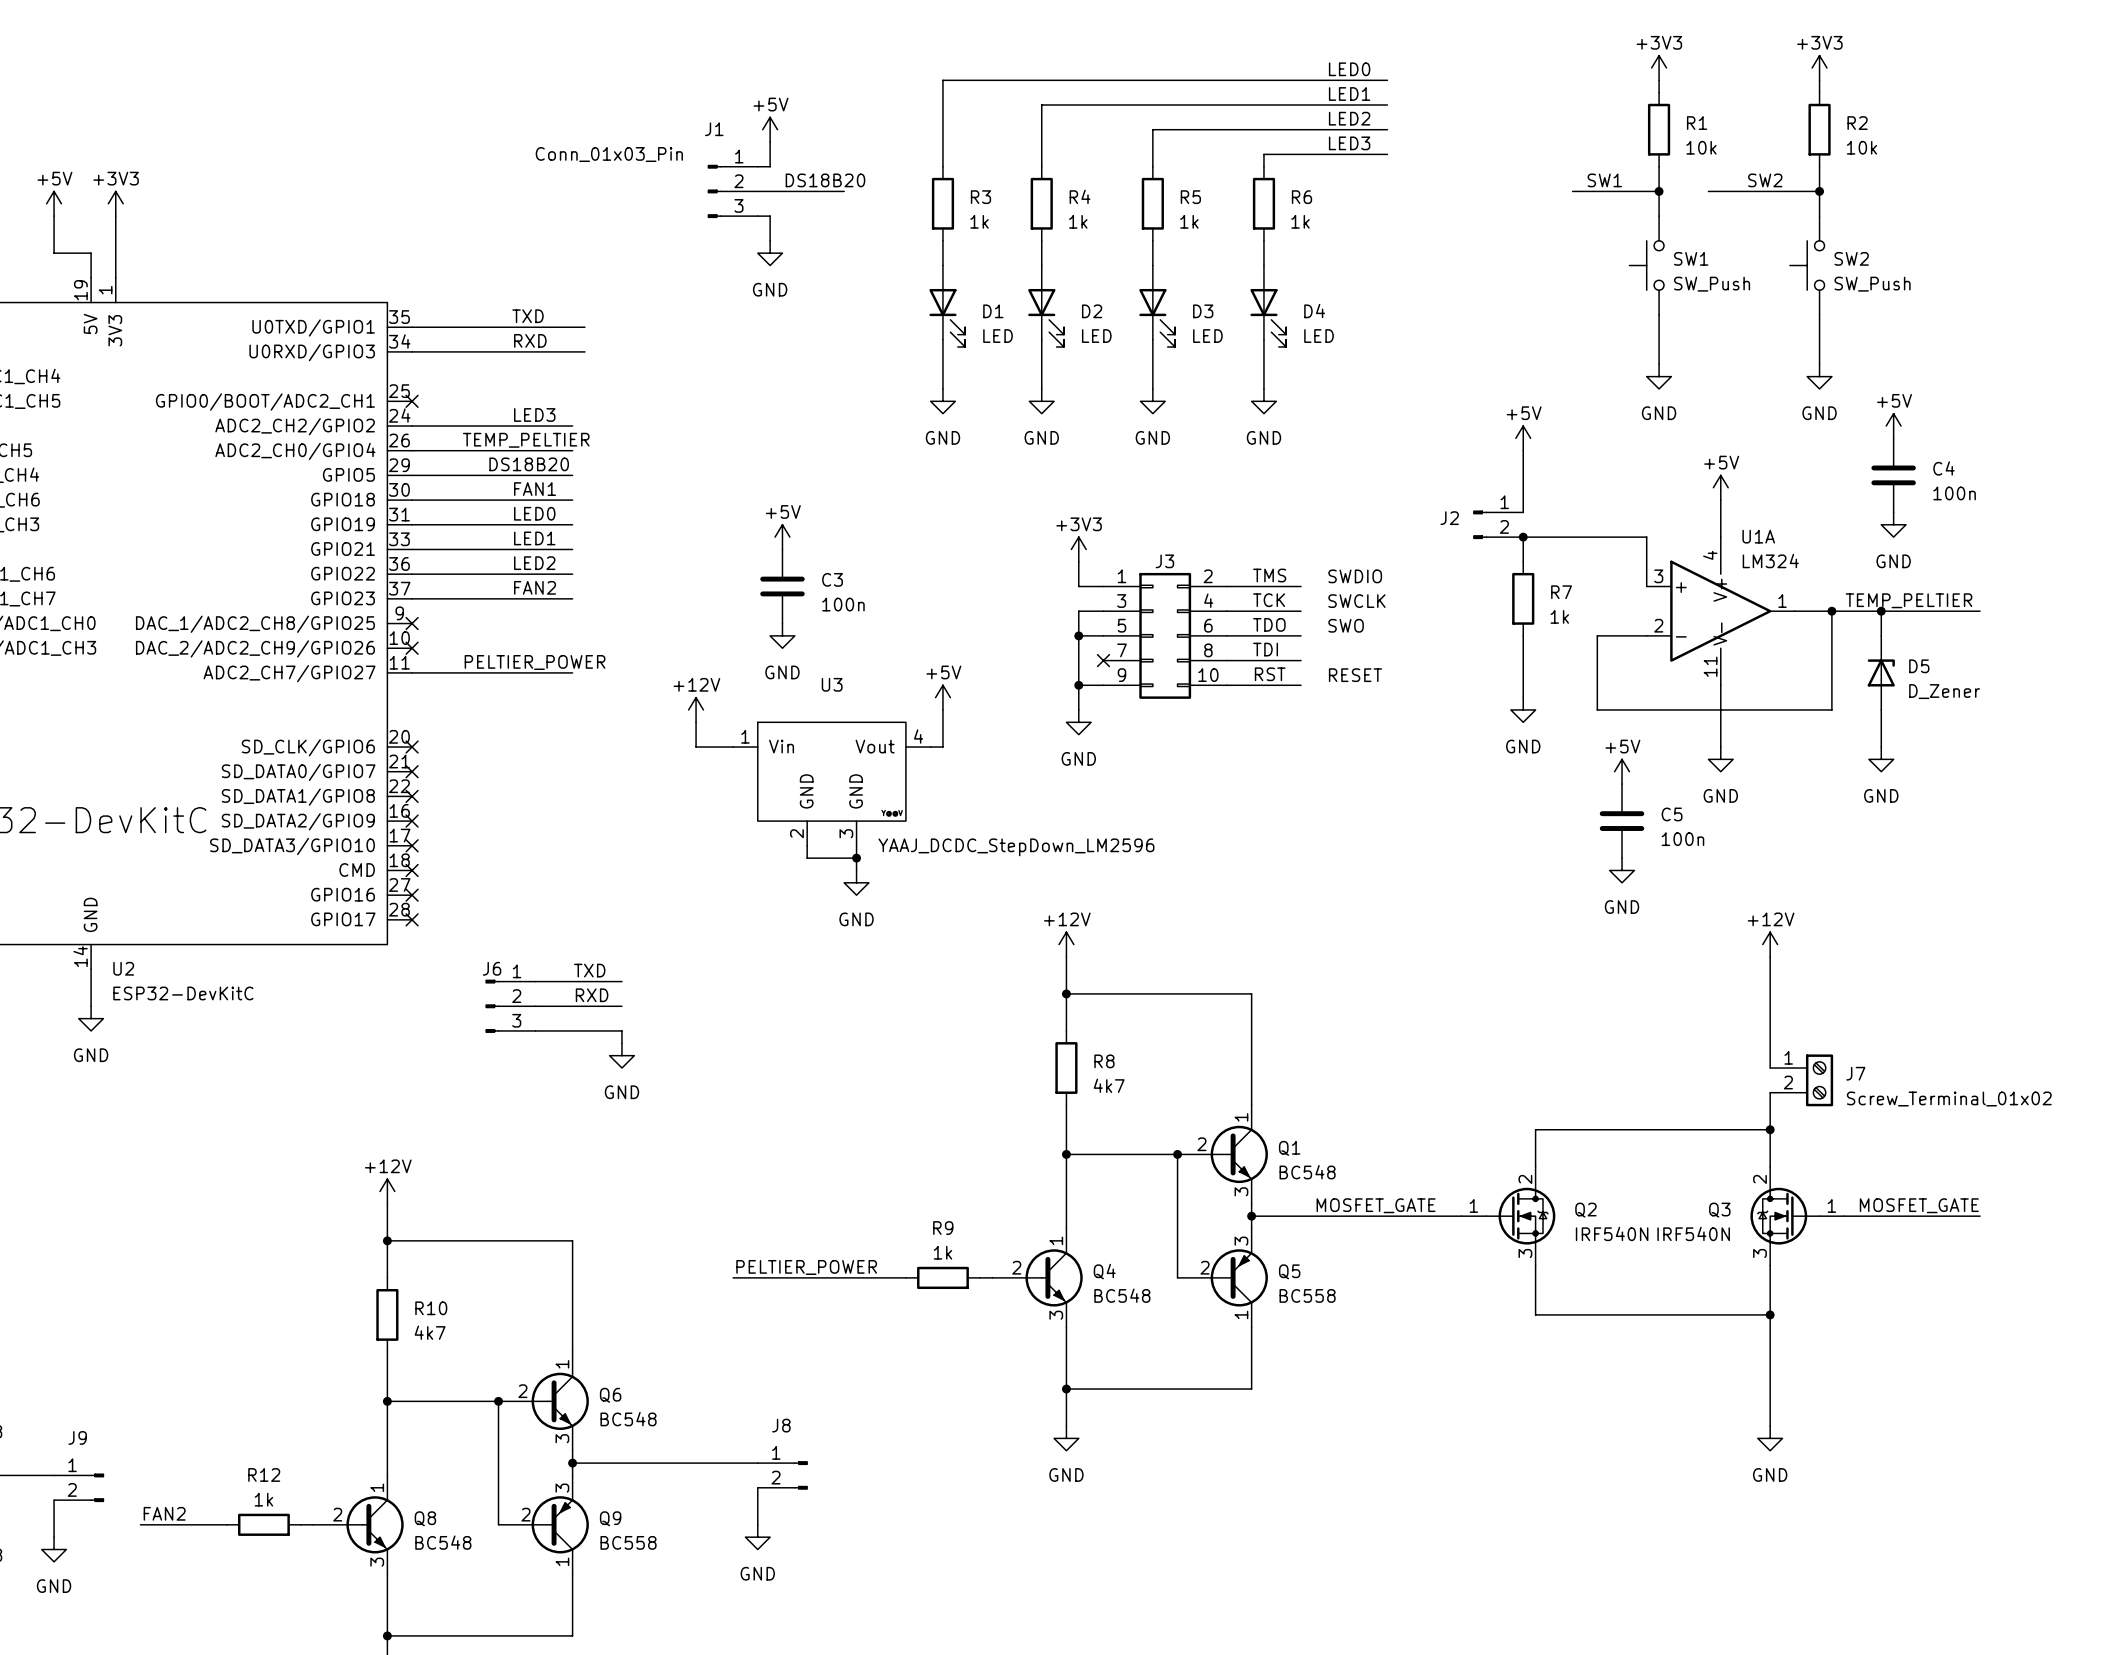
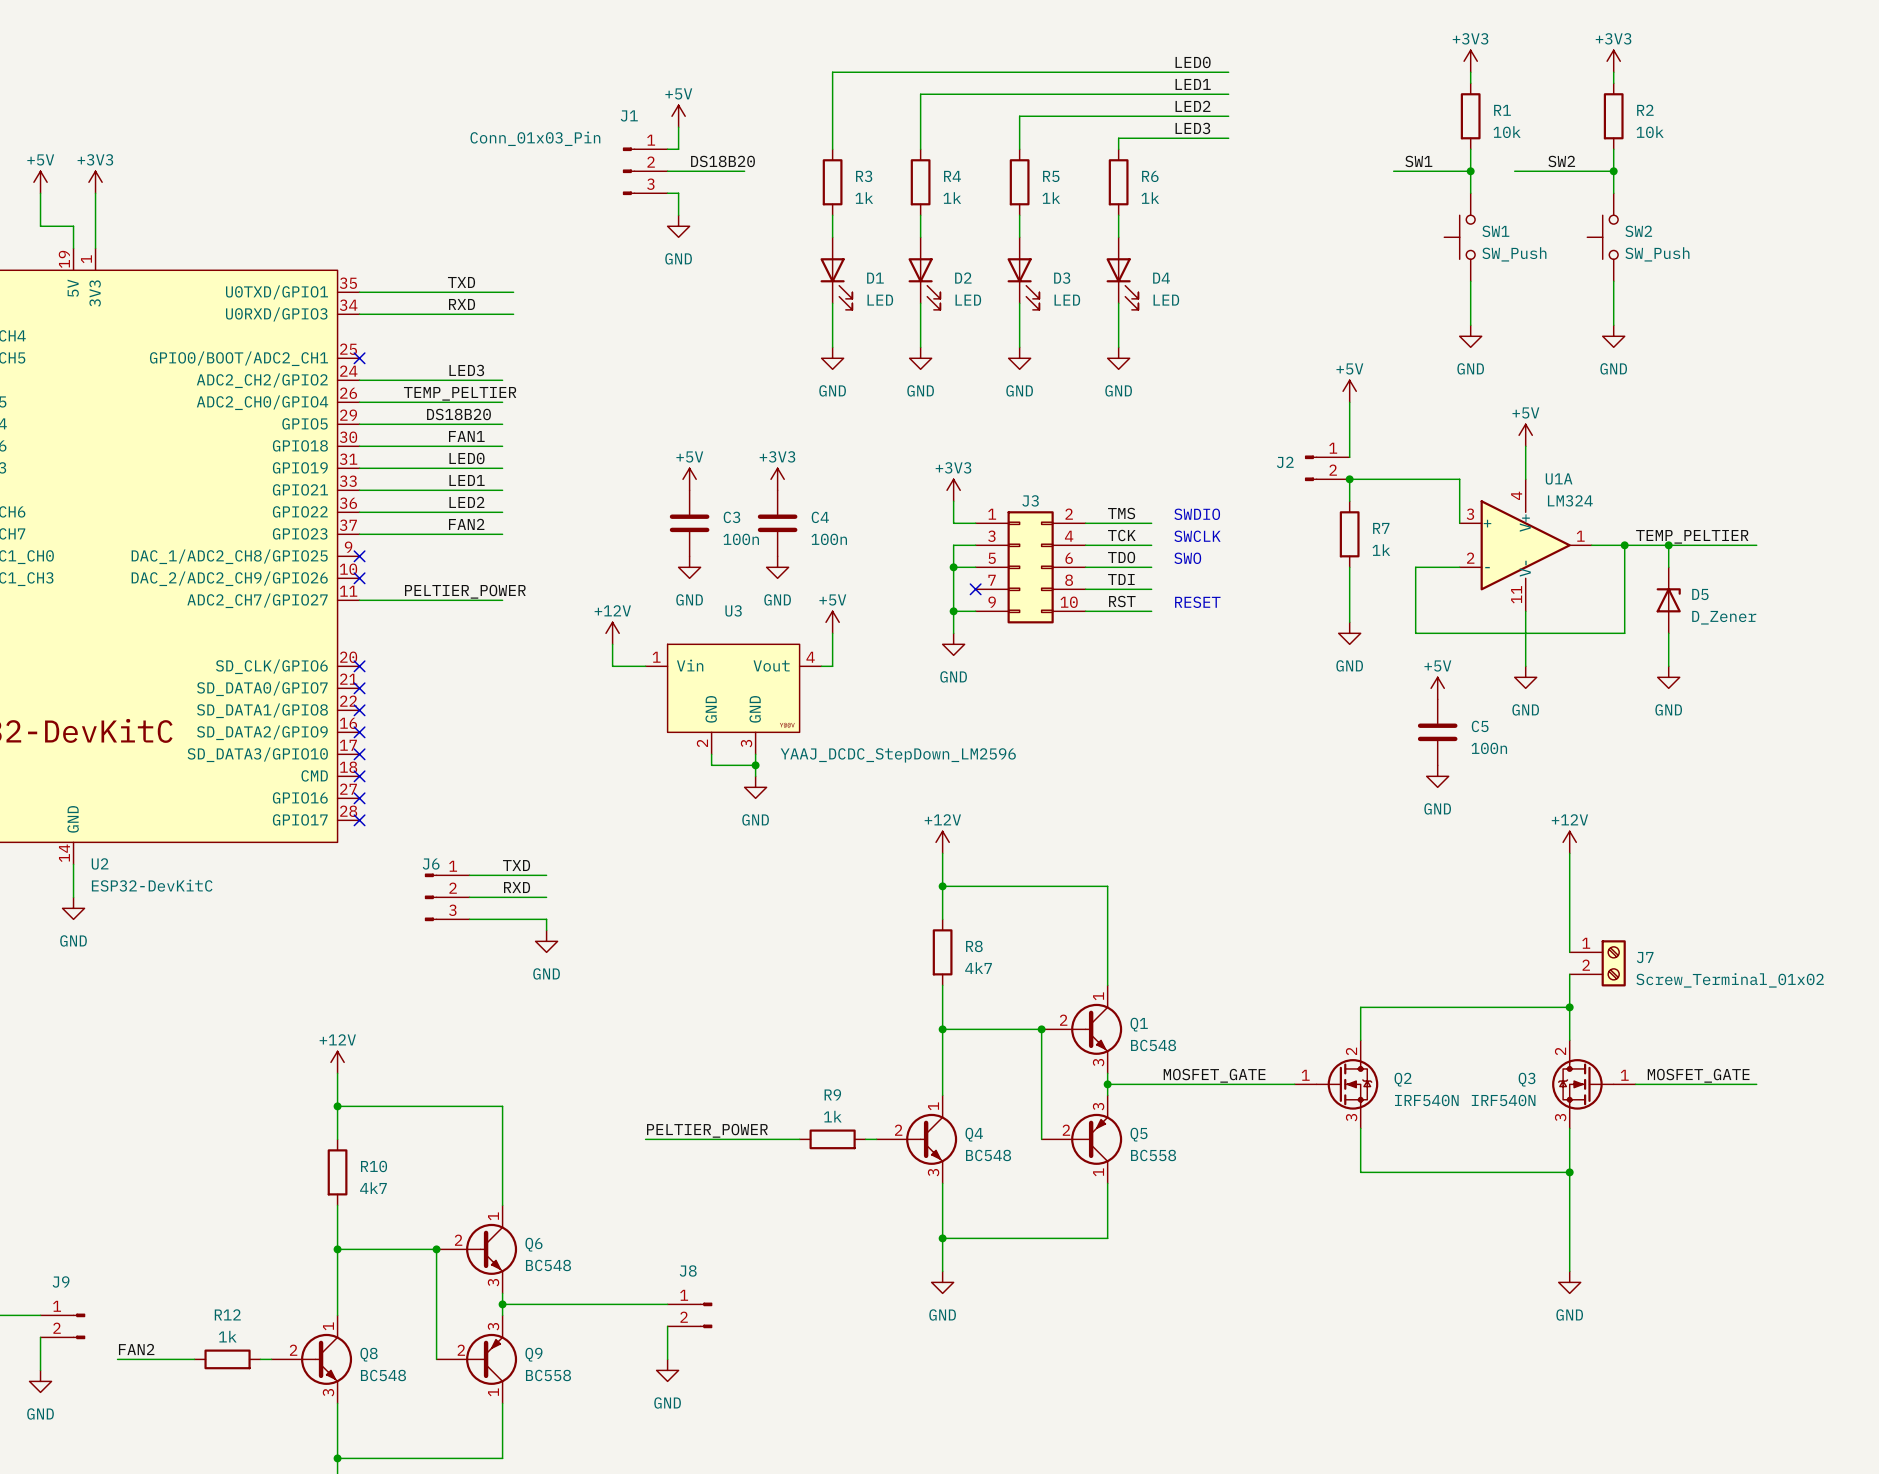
power symbol: +5V (1893, 426) -> none
C4 position: (1893, 475) -> (777, 523)
power symbol: GND (1893, 524) -> none
power symbol: none -> +3V3 (777, 479)
power symbol: none -> GND (777, 567)

